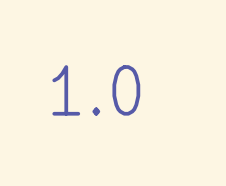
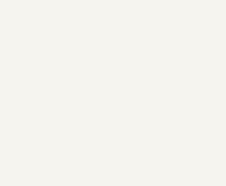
text: 1.0 (96, 90) -> none

